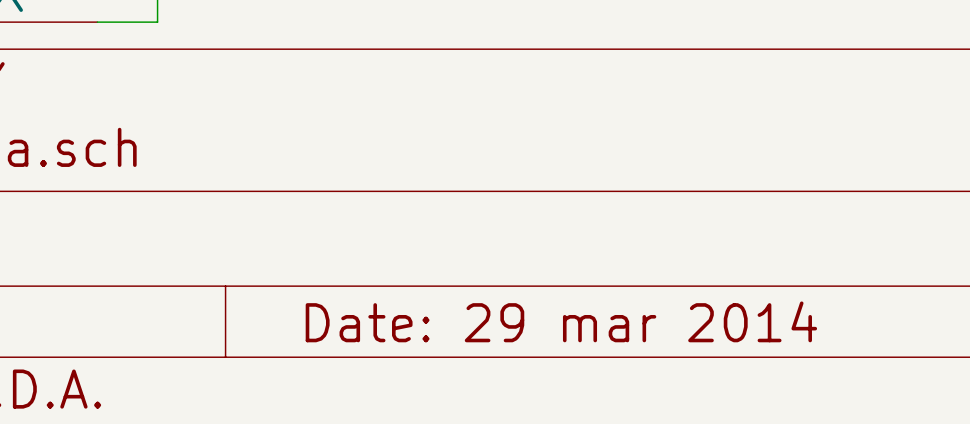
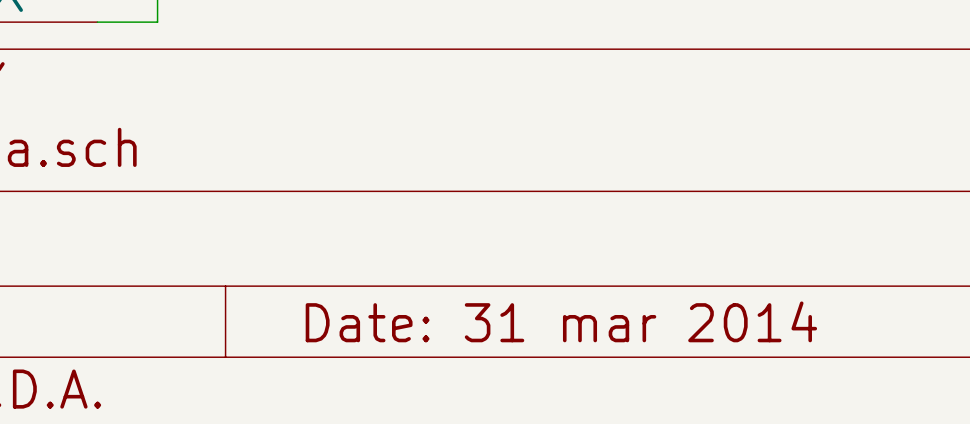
title block: Date: 29 mar 2014 (561, 321) -> Date: 31 mar 2014 (561, 321)

